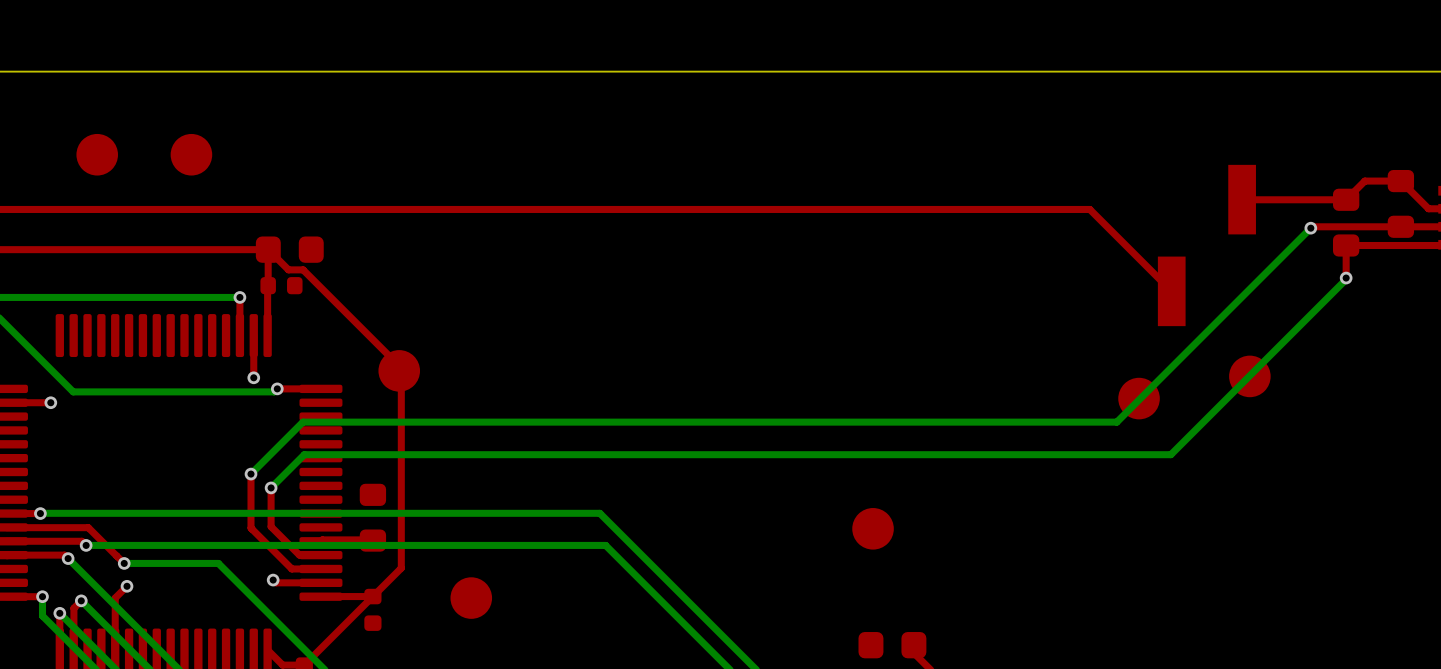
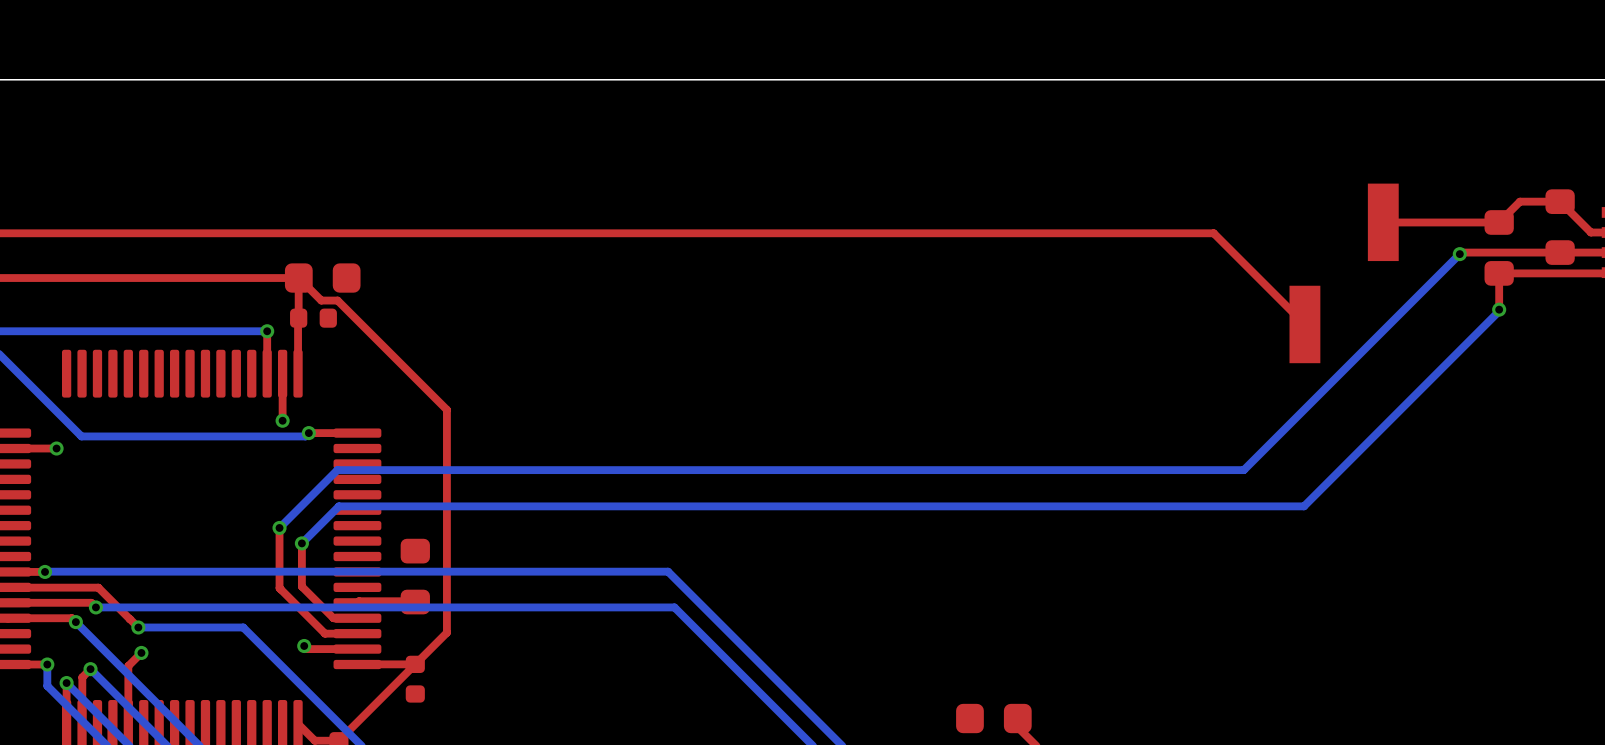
part: (97, 154) -> none
part: (191, 154) -> none
part: (399, 370) -> none
part: (1249, 376) -> none
part: (1139, 398) -> none
part: (873, 528) -> none
part: (471, 598) -> none

